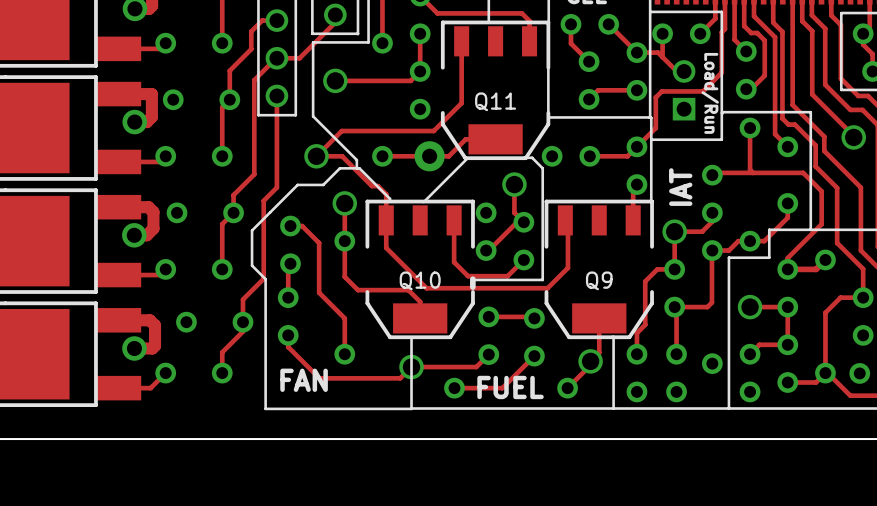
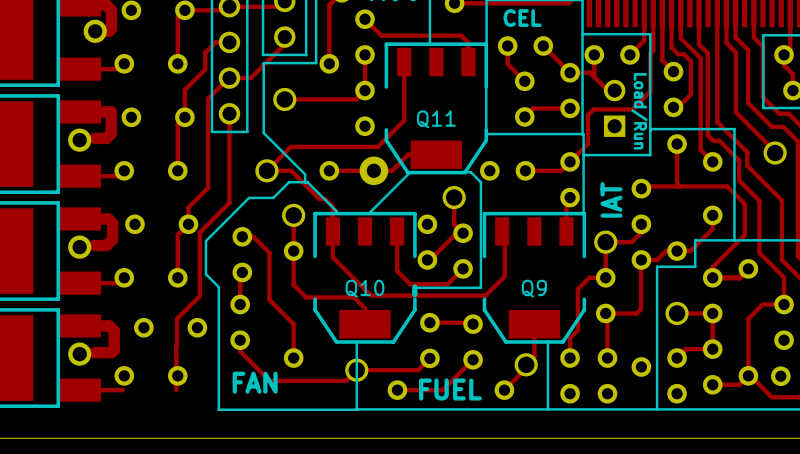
part position: (134, 122) -> (79, 140)
track: (276, 187) (263, 200) (263, 278) (242, 299) (242, 331) (222, 352) (222, 373) -> (229, 200) (229, 202) (199, 232) (199, 295) (177, 318) (176, 390)
part position: (134, 235) -> (79, 247)
part position: (134, 348) -> (79, 354)
track: (165, 373) (150, 388) -> (122, 390) (110, 390)

